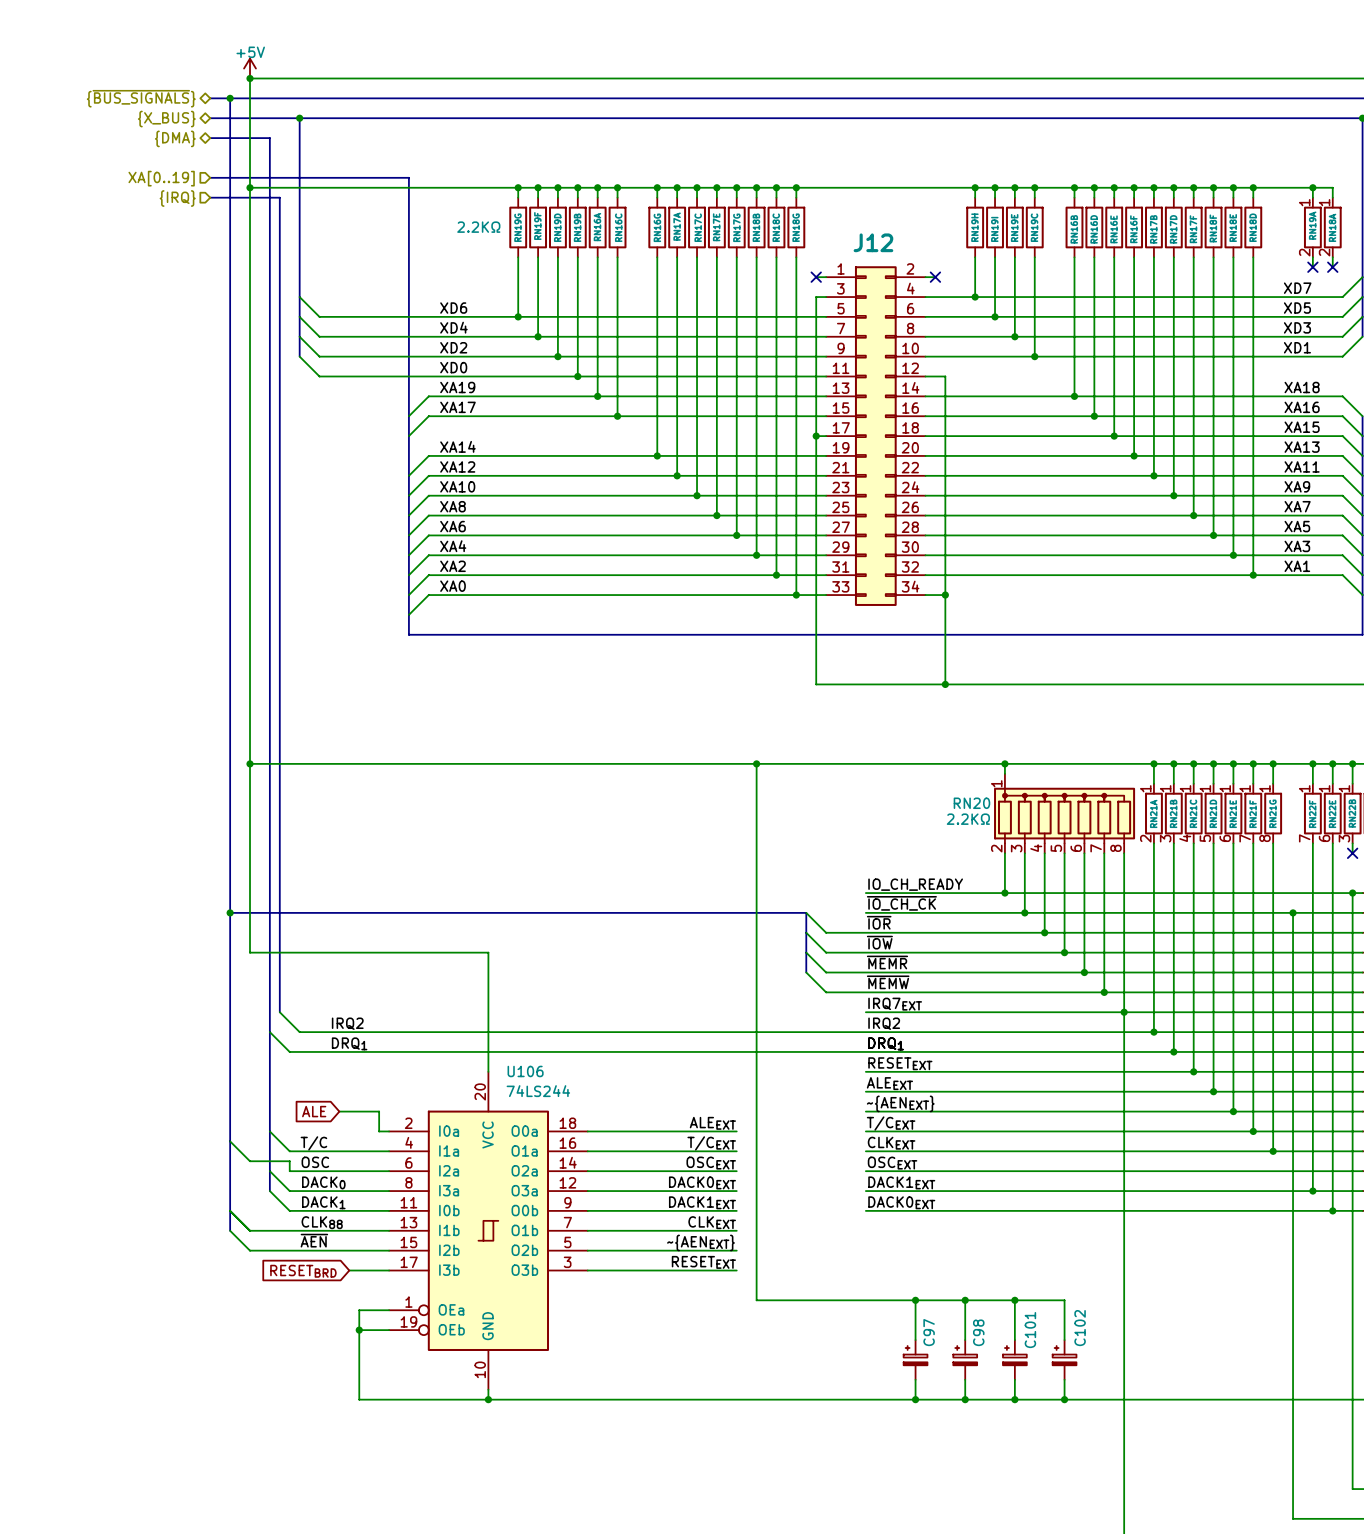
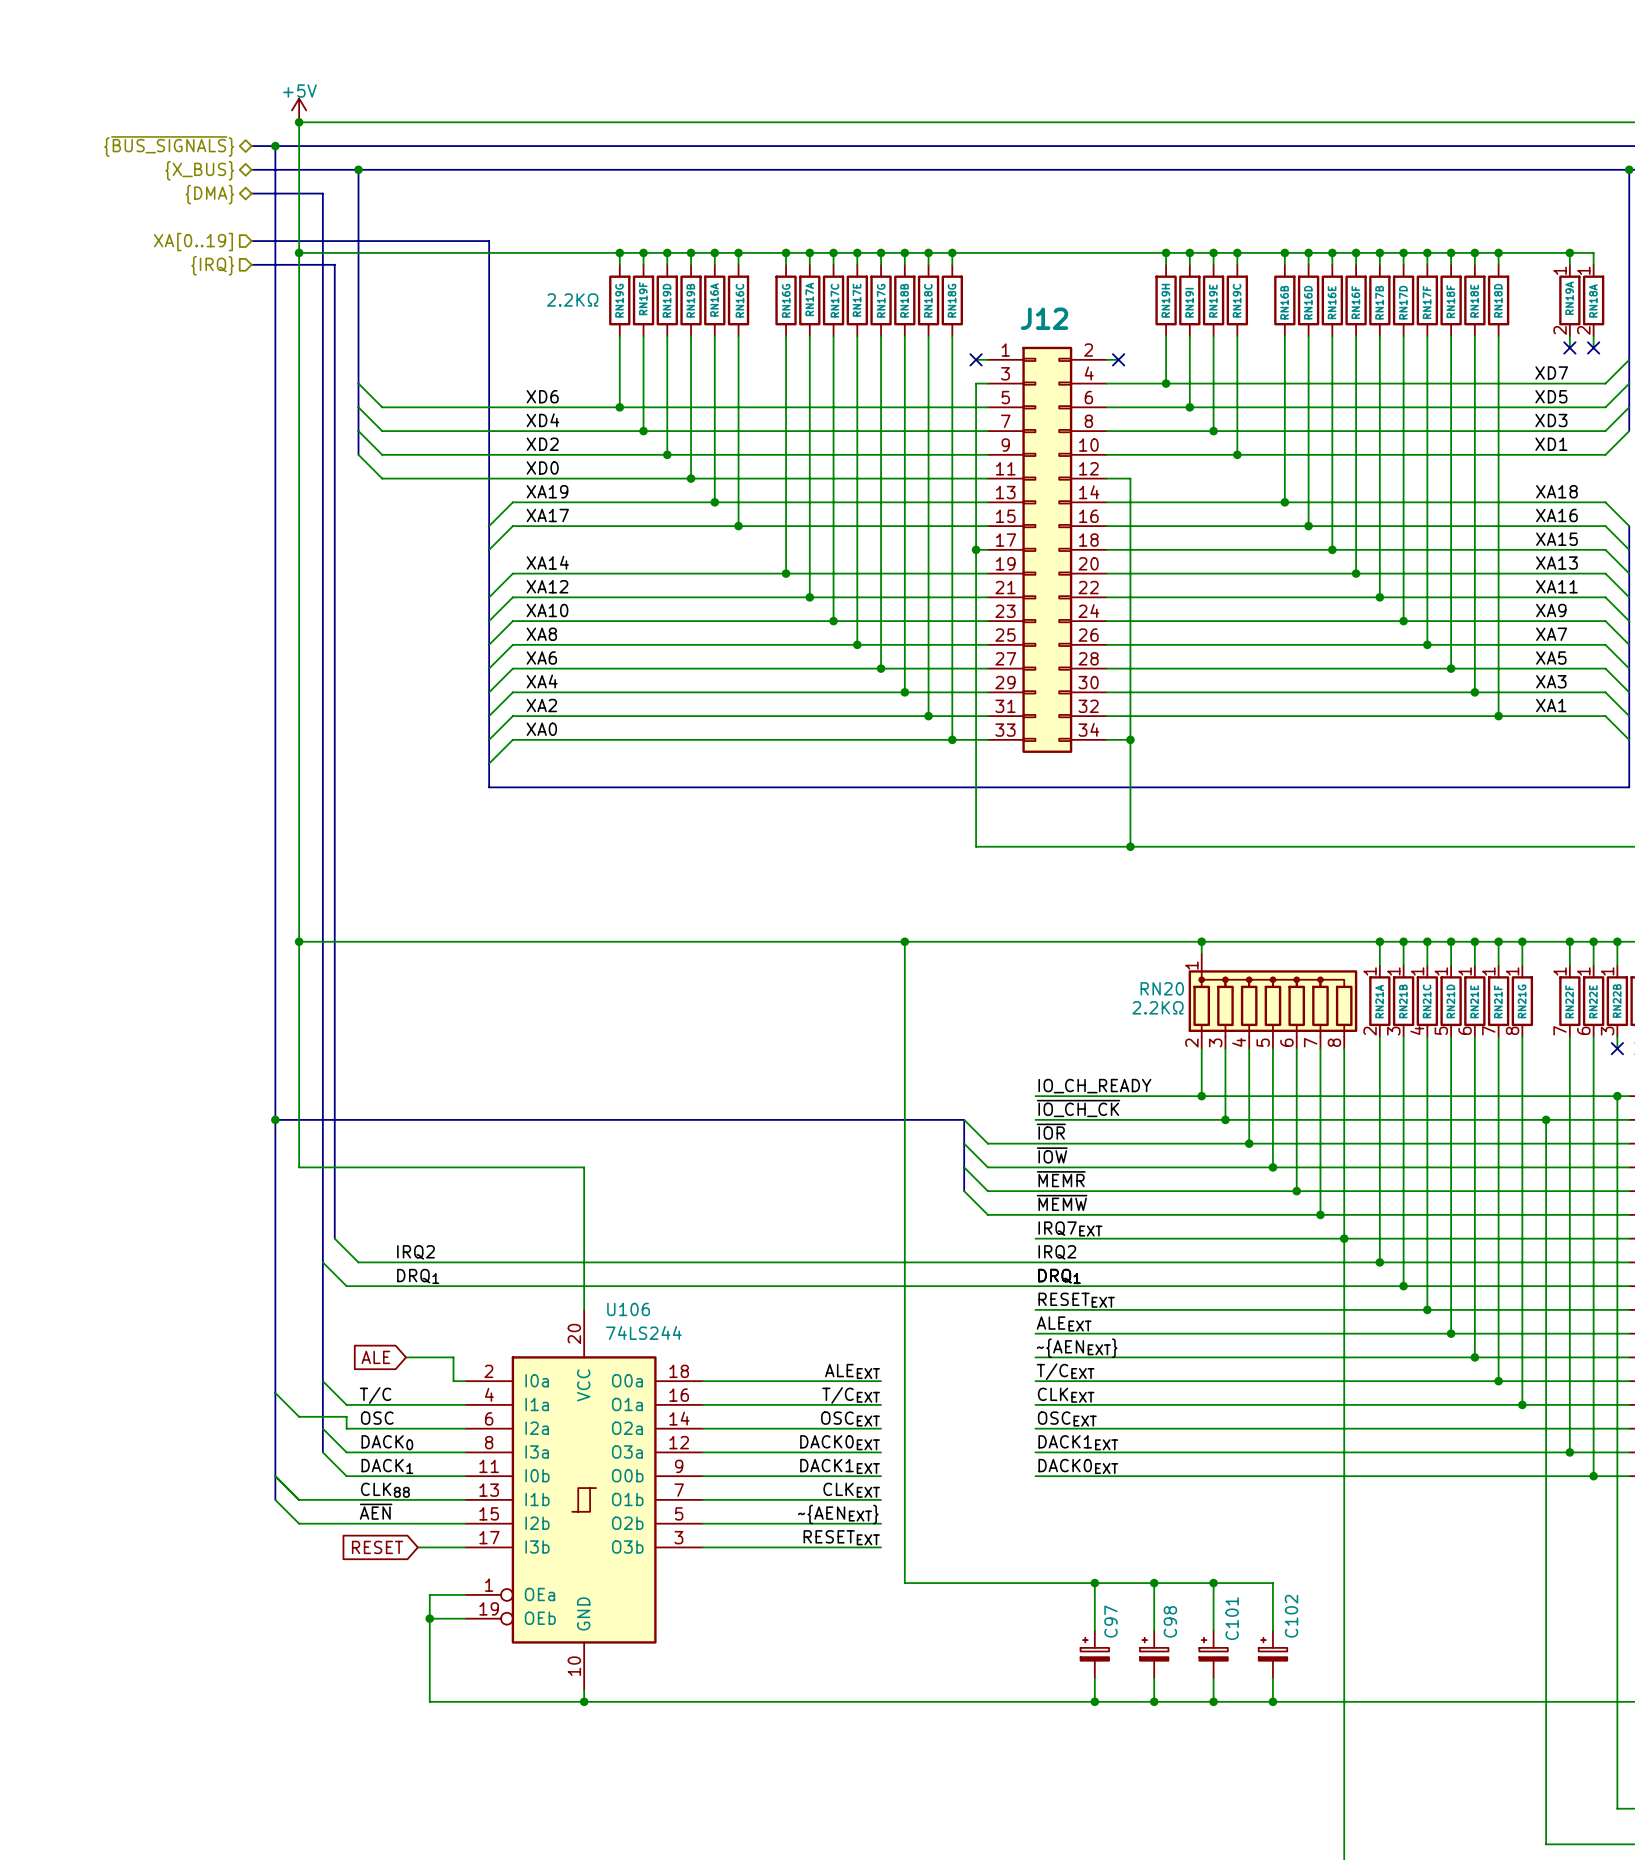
global label: RESETBRD (303, 1271) -> RESET (377, 1547)

